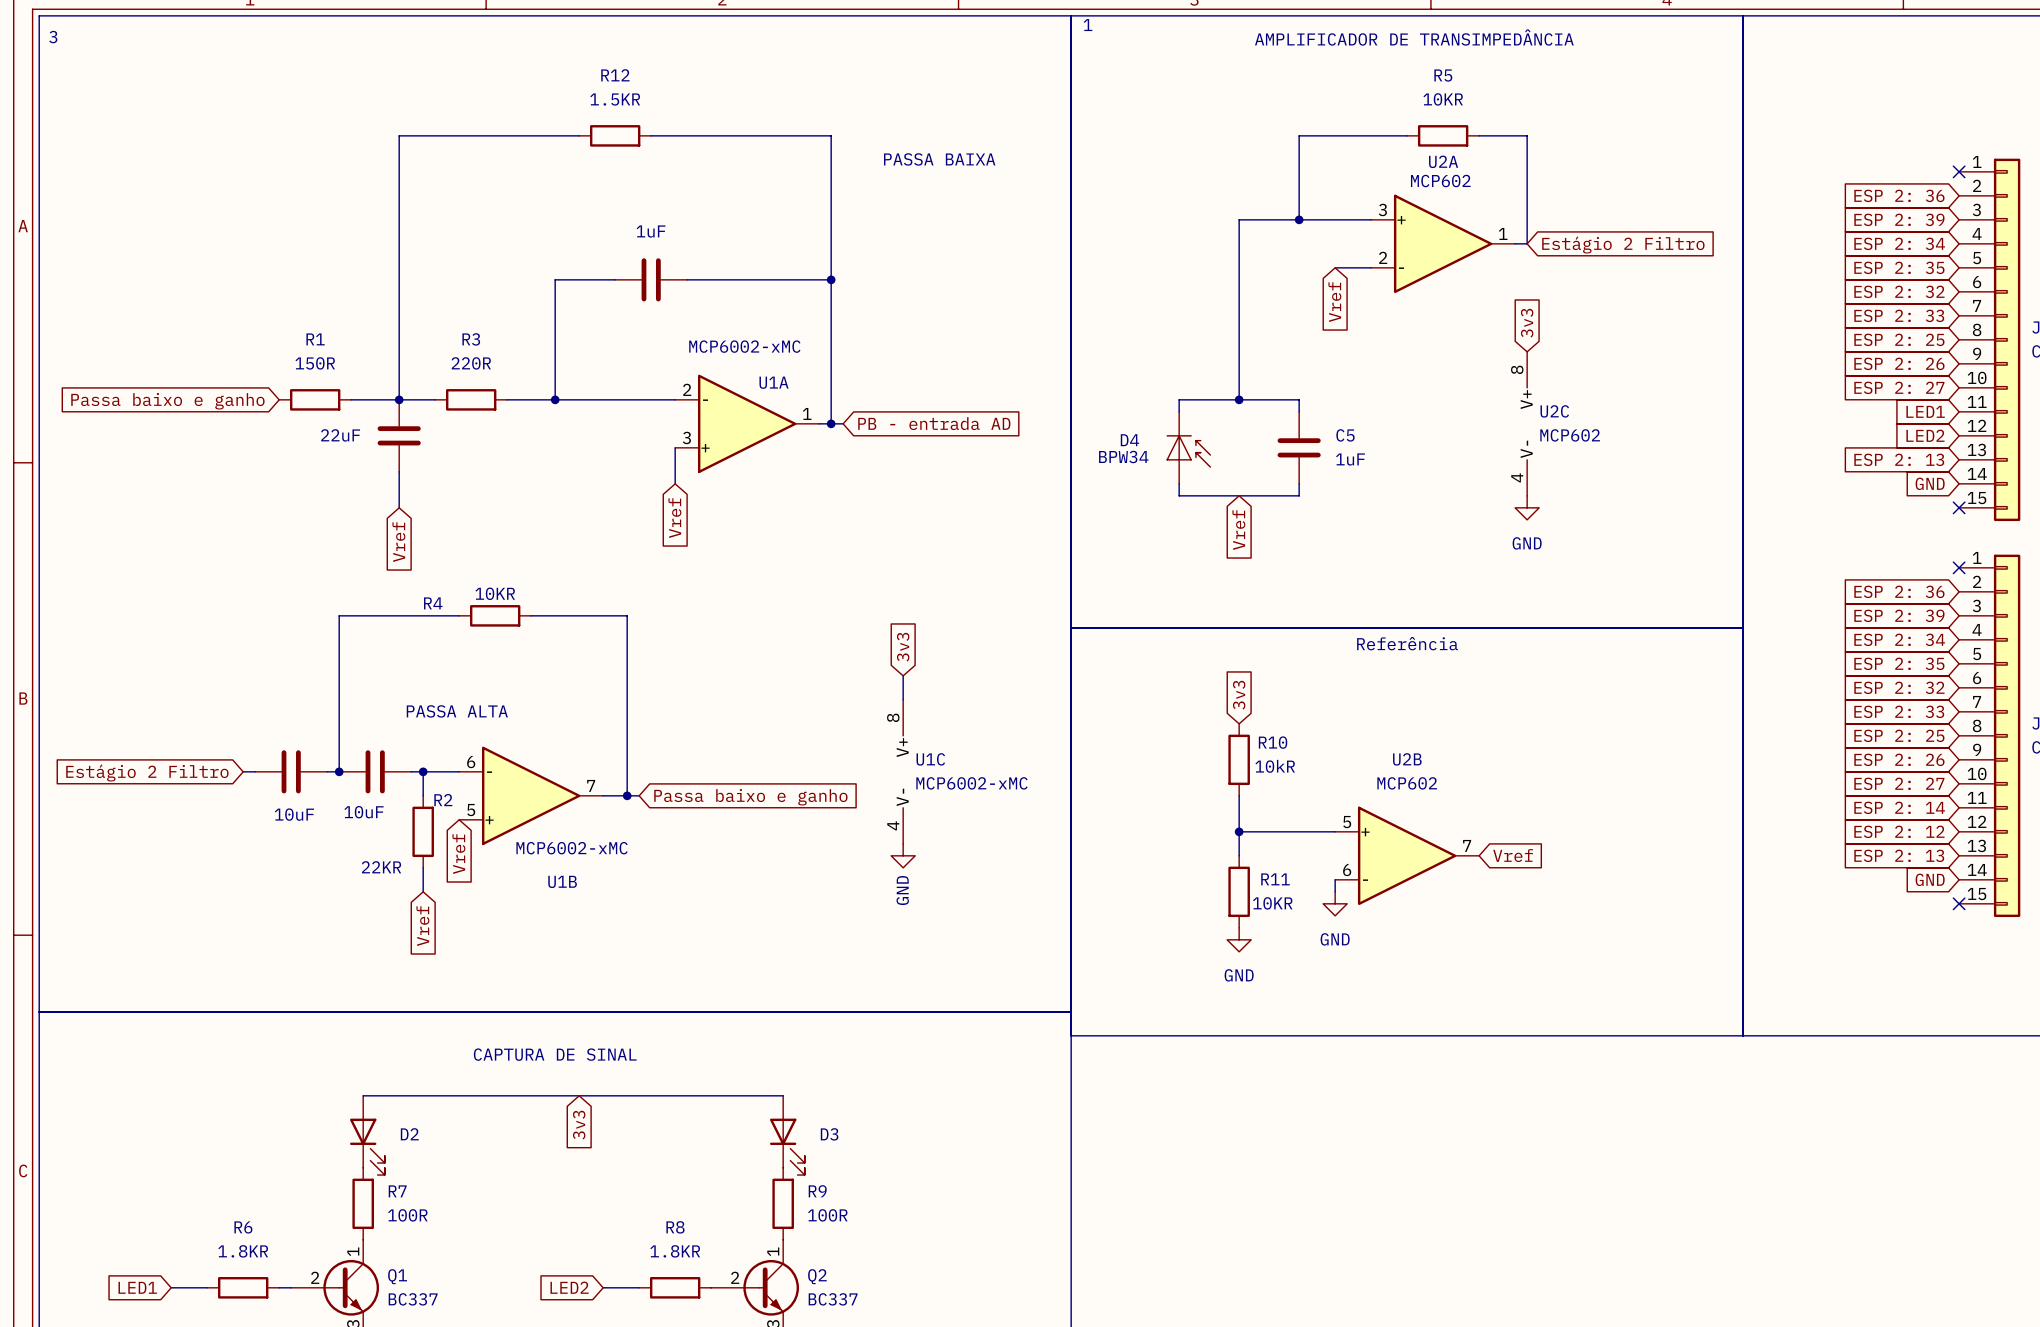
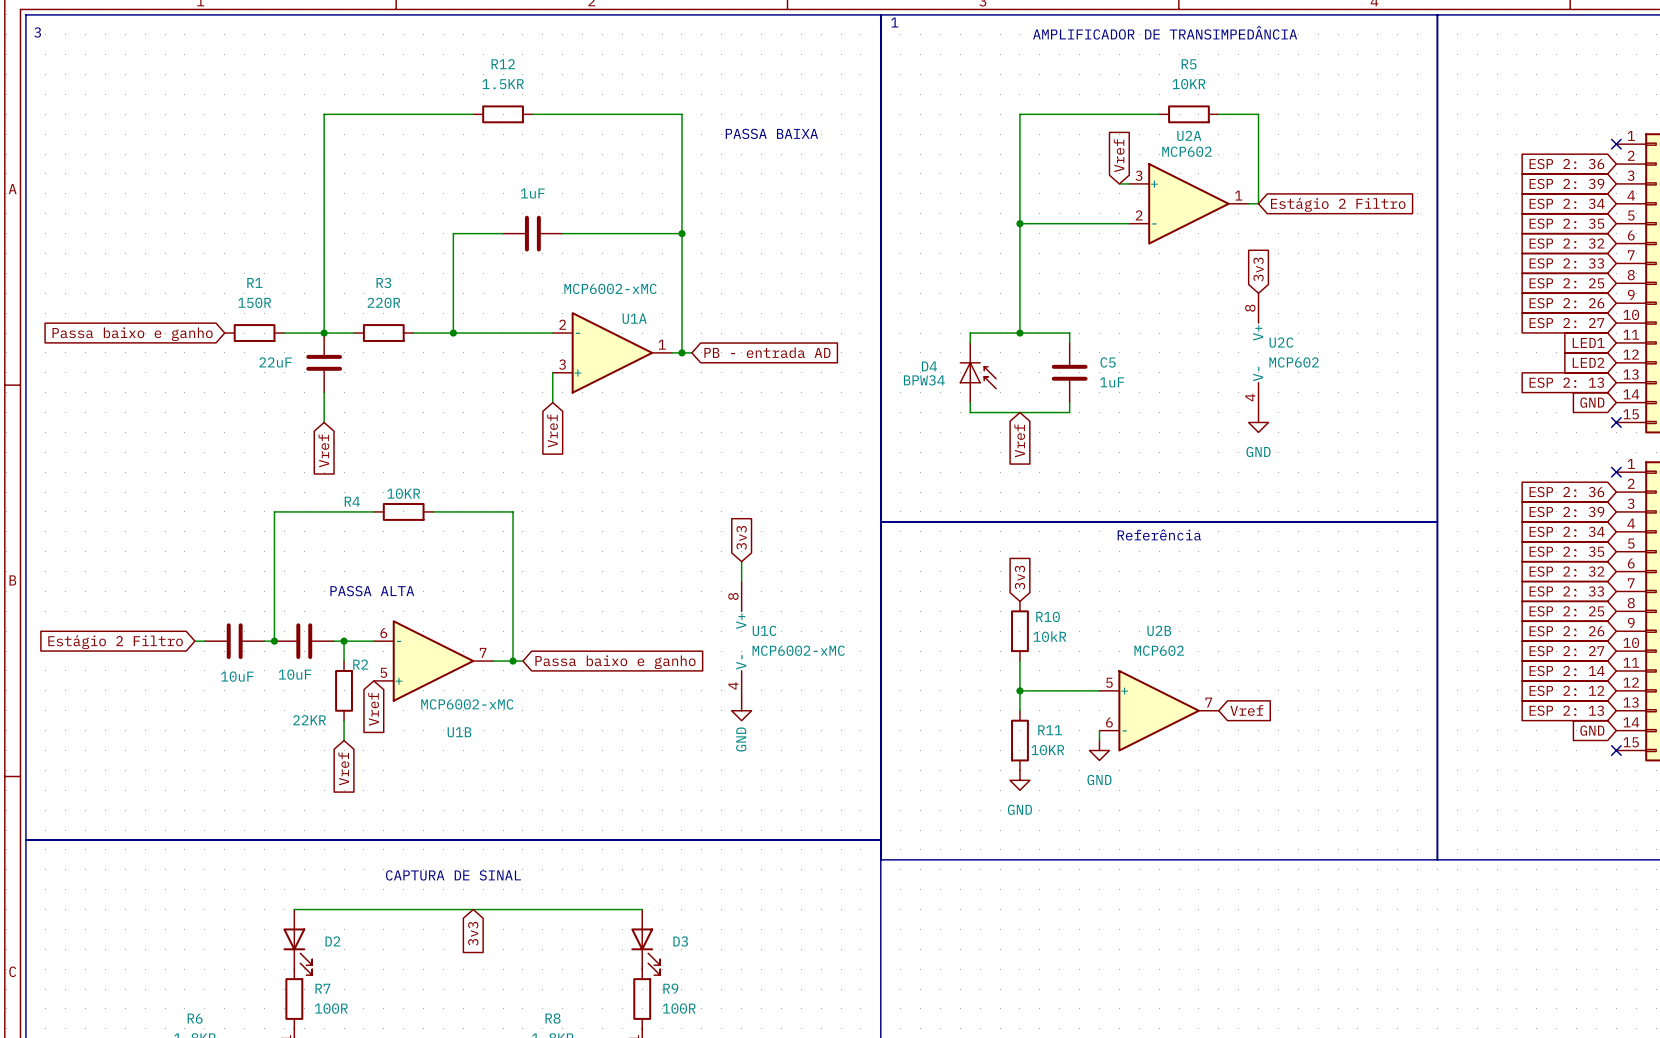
wire: (1299, 135) (1299, 219) -> (1069, 114) (1019, 114) (1019, 183)
wire: (1239, 219) (1359, 219) -> none
junction: (1299, 219) -> none
wire: none -> (1019, 223) (1099, 223)
junction: none -> (1019, 223)
global label rotation: 0° (1334, 302) -> 180° (1119, 155)
global label position: Vref (1334, 302) -> Vref (1119, 155)

